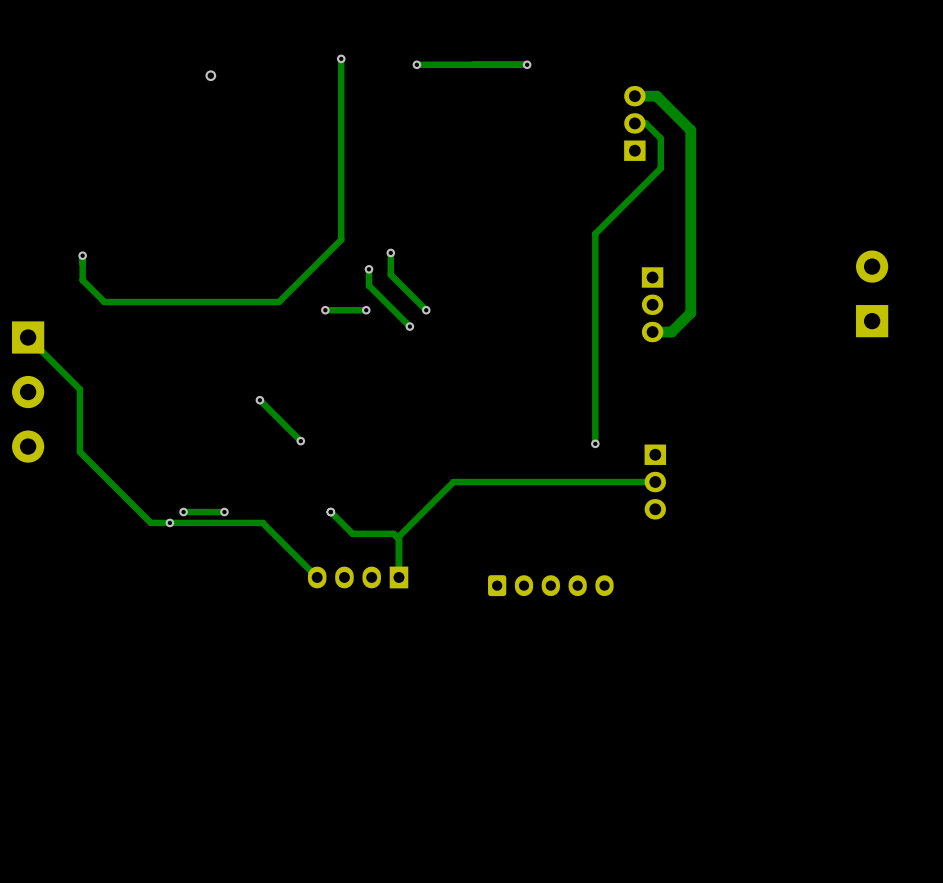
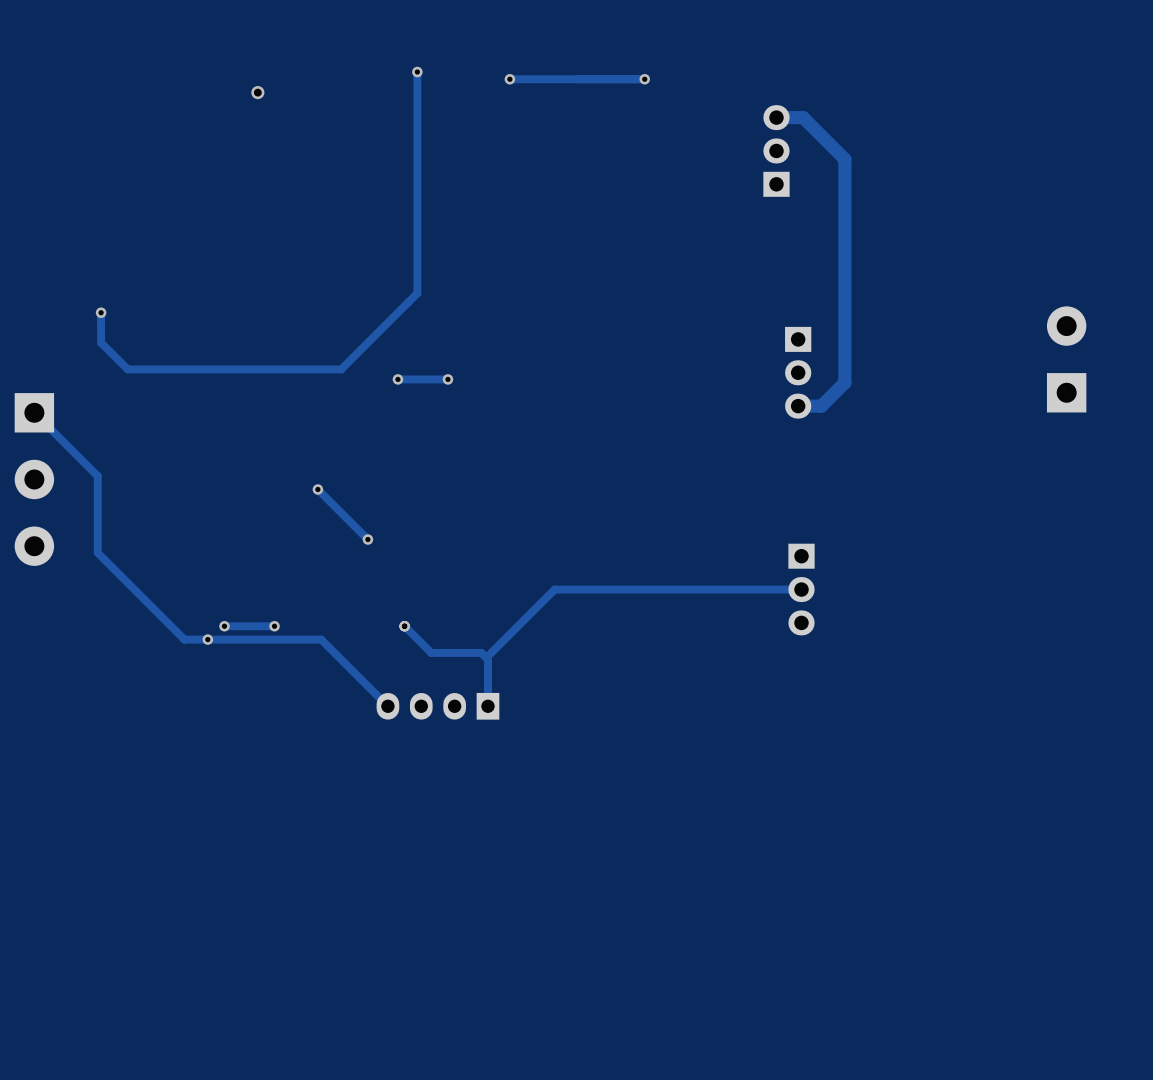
track: (634, 123) (645, 123) (660, 138) (660, 168) (595, 233) (595, 443) -> none
track: (390, 252) (390, 274) (426, 310) -> none
via: (390, 252) -> none
track: (368, 269) (368, 285) (409, 326) -> none
via: (368, 269) -> none
via: (426, 310) -> none
via: (409, 326) -> none
via: (595, 443) -> none
part: (550, 585) -> none

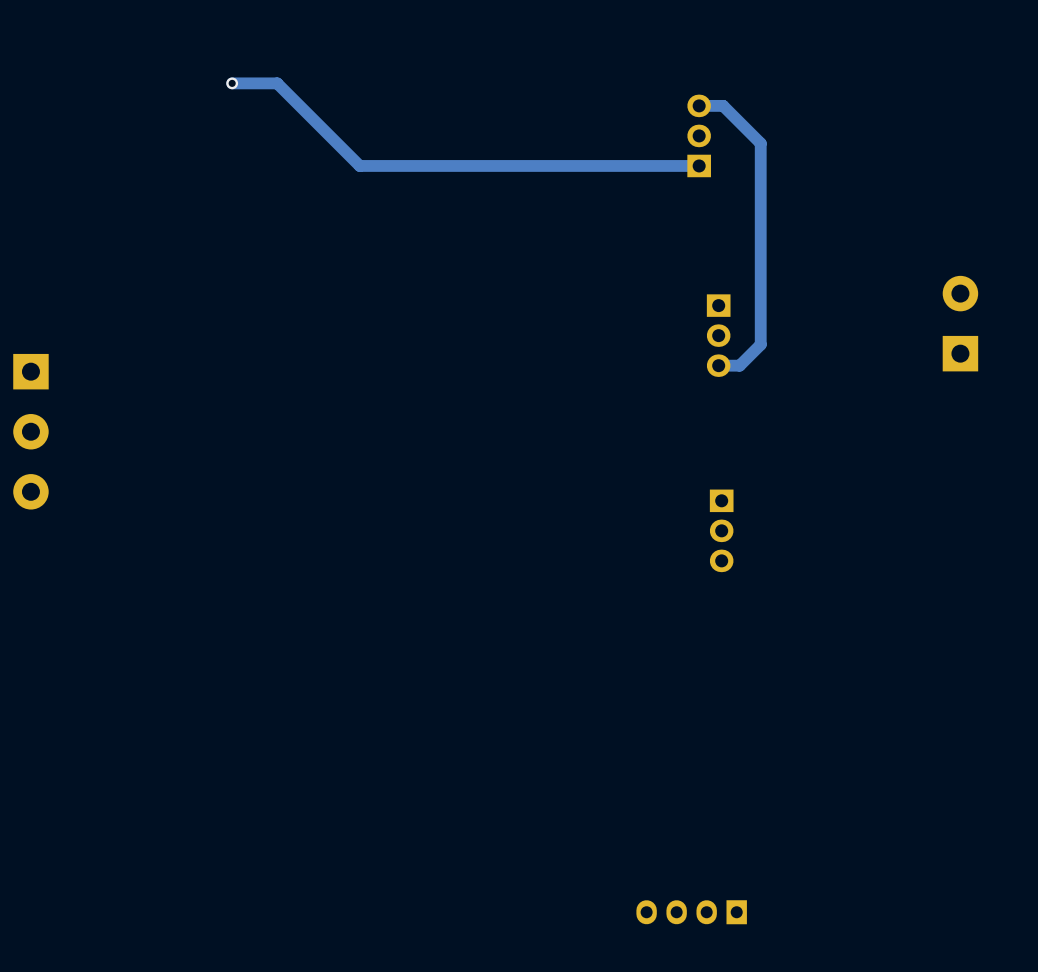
track: (417, 72) (417, 293) (341, 369) (127, 369) (101, 342) (101, 312) -> none
via: (417, 72) -> none
via: (509, 79) -> none
track: (644, 79) (509, 79) -> none
via: (644, 79) -> none
track: none -> (232, 83) (277, 83) (359, 165) (699, 165)
via: (101, 312) -> none
via: (397, 379) -> none
track: (447, 379) (397, 379) -> none
via: (447, 379) -> none
track: (34, 412) (97, 476) (97, 552) (184, 639) (321, 639) (387, 706) -> none
track: (317, 489) (367, 539) -> none
via: (317, 489) -> none
via: (367, 539) -> none
track: (801, 589) (554, 589) (487, 656) (487, 706) -> none
via: (224, 626) -> none
track: (274, 626) (224, 626) -> none
via: (274, 626) -> none
track: (404, 626) (431, 652) (481, 652) (487, 659) -> none
via: (404, 626) -> none
via: (207, 639) -> none
part: (437, 706) -> none
part: none -> (691, 912)

